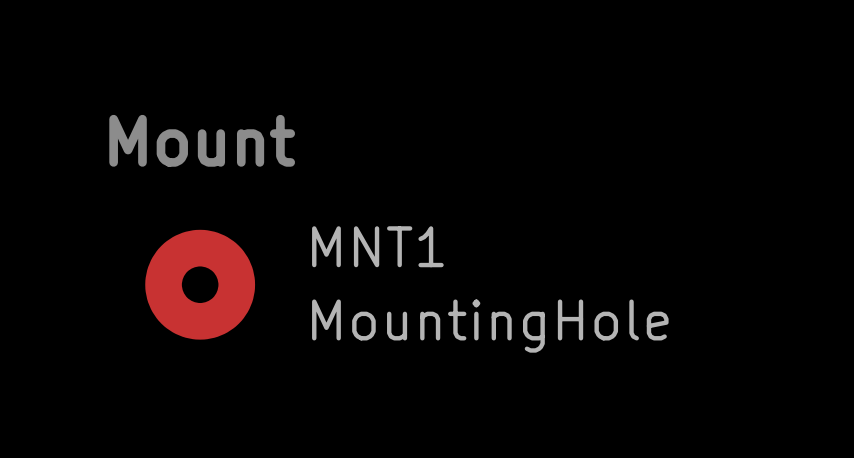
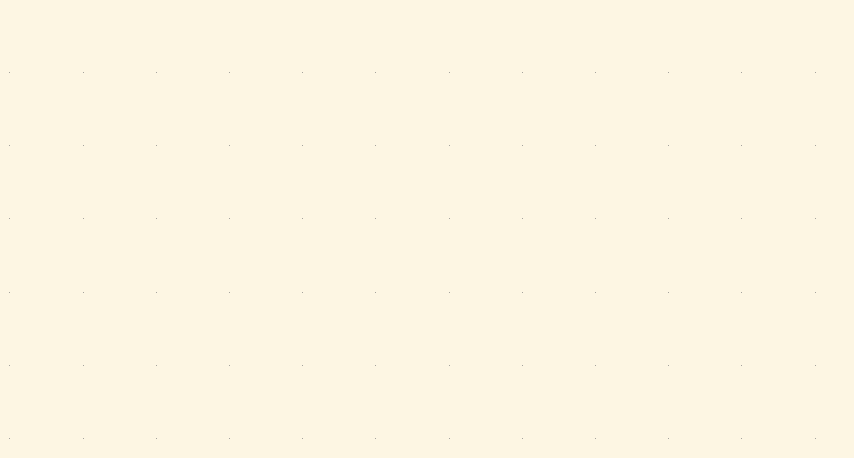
text: Mount (202, 140) -> none
MNT1: MountingHole (200, 284) -> none

